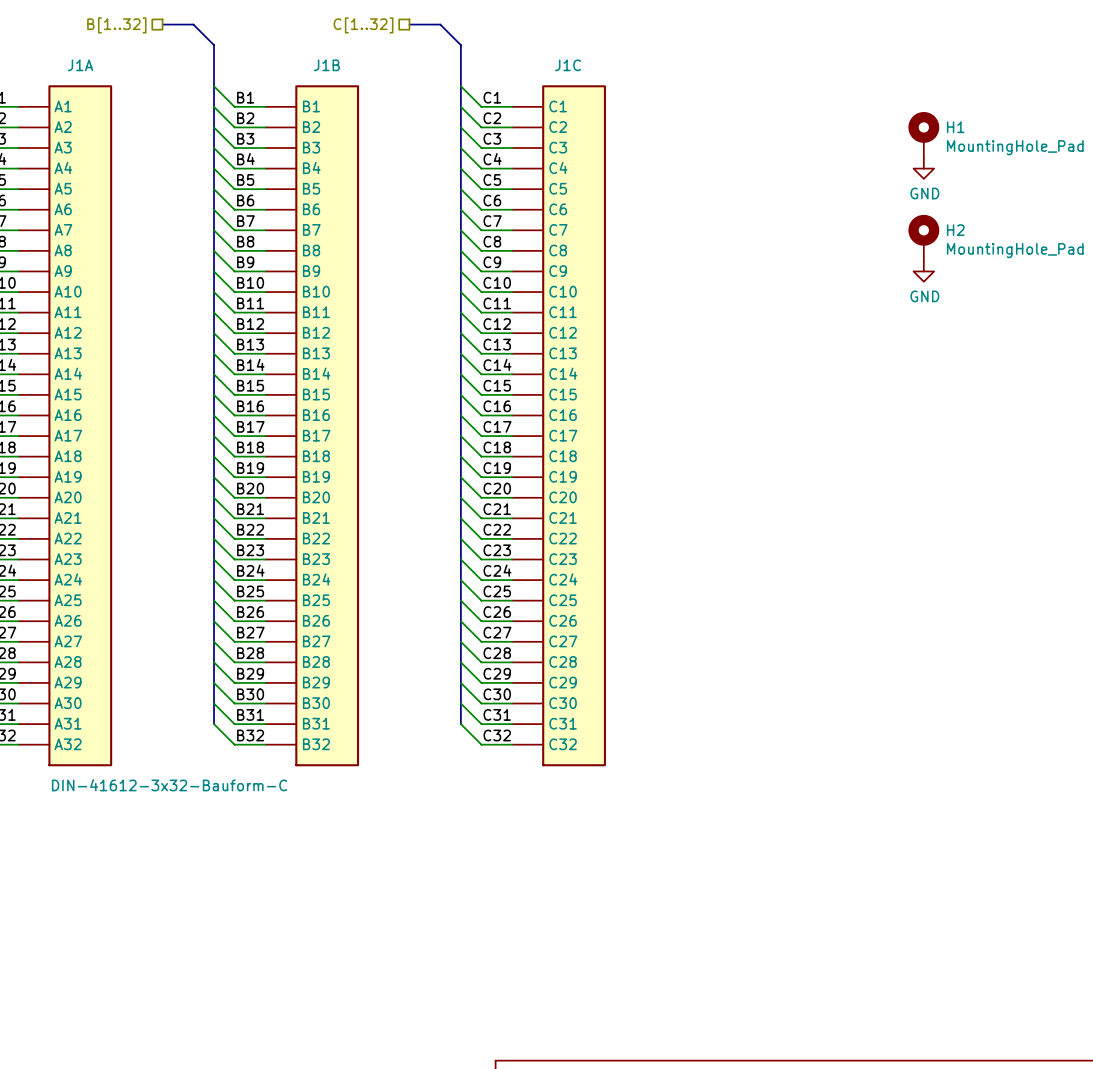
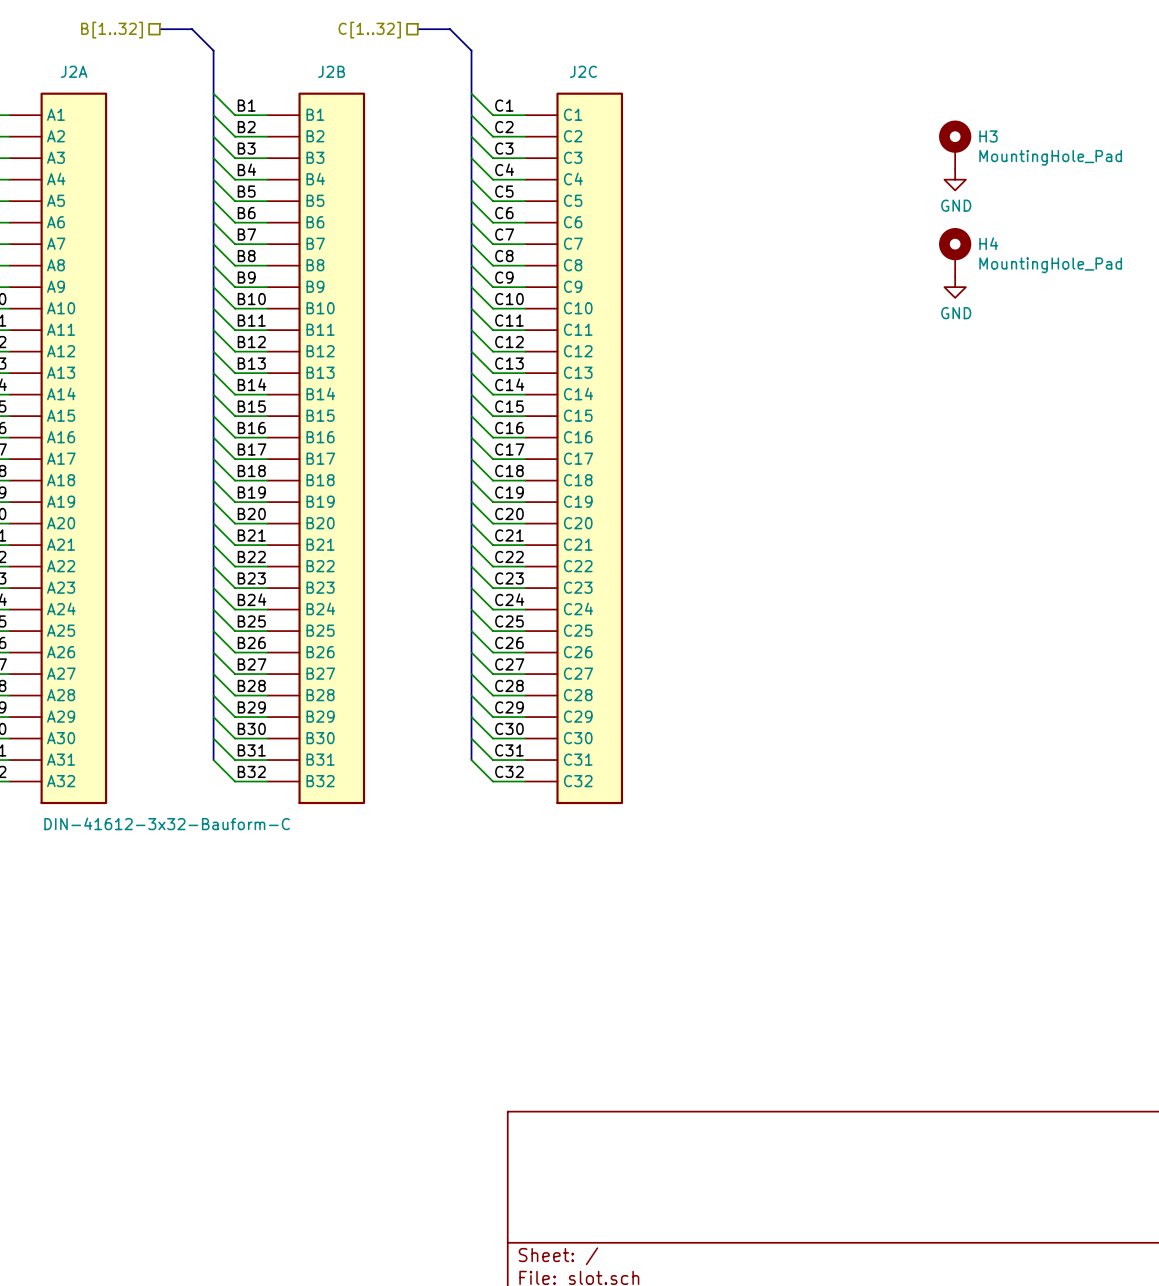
J1A name: J1A (80, 65) -> J2A (74, 71)
J1B name: J1B (326, 65) -> J2B (331, 71)
J1C name: J1C (568, 65) -> J2C (583, 71)
H1 name: H1 (955, 127) -> H3 (988, 136)
H2 name: H2 (955, 230) -> H4 (988, 243)

